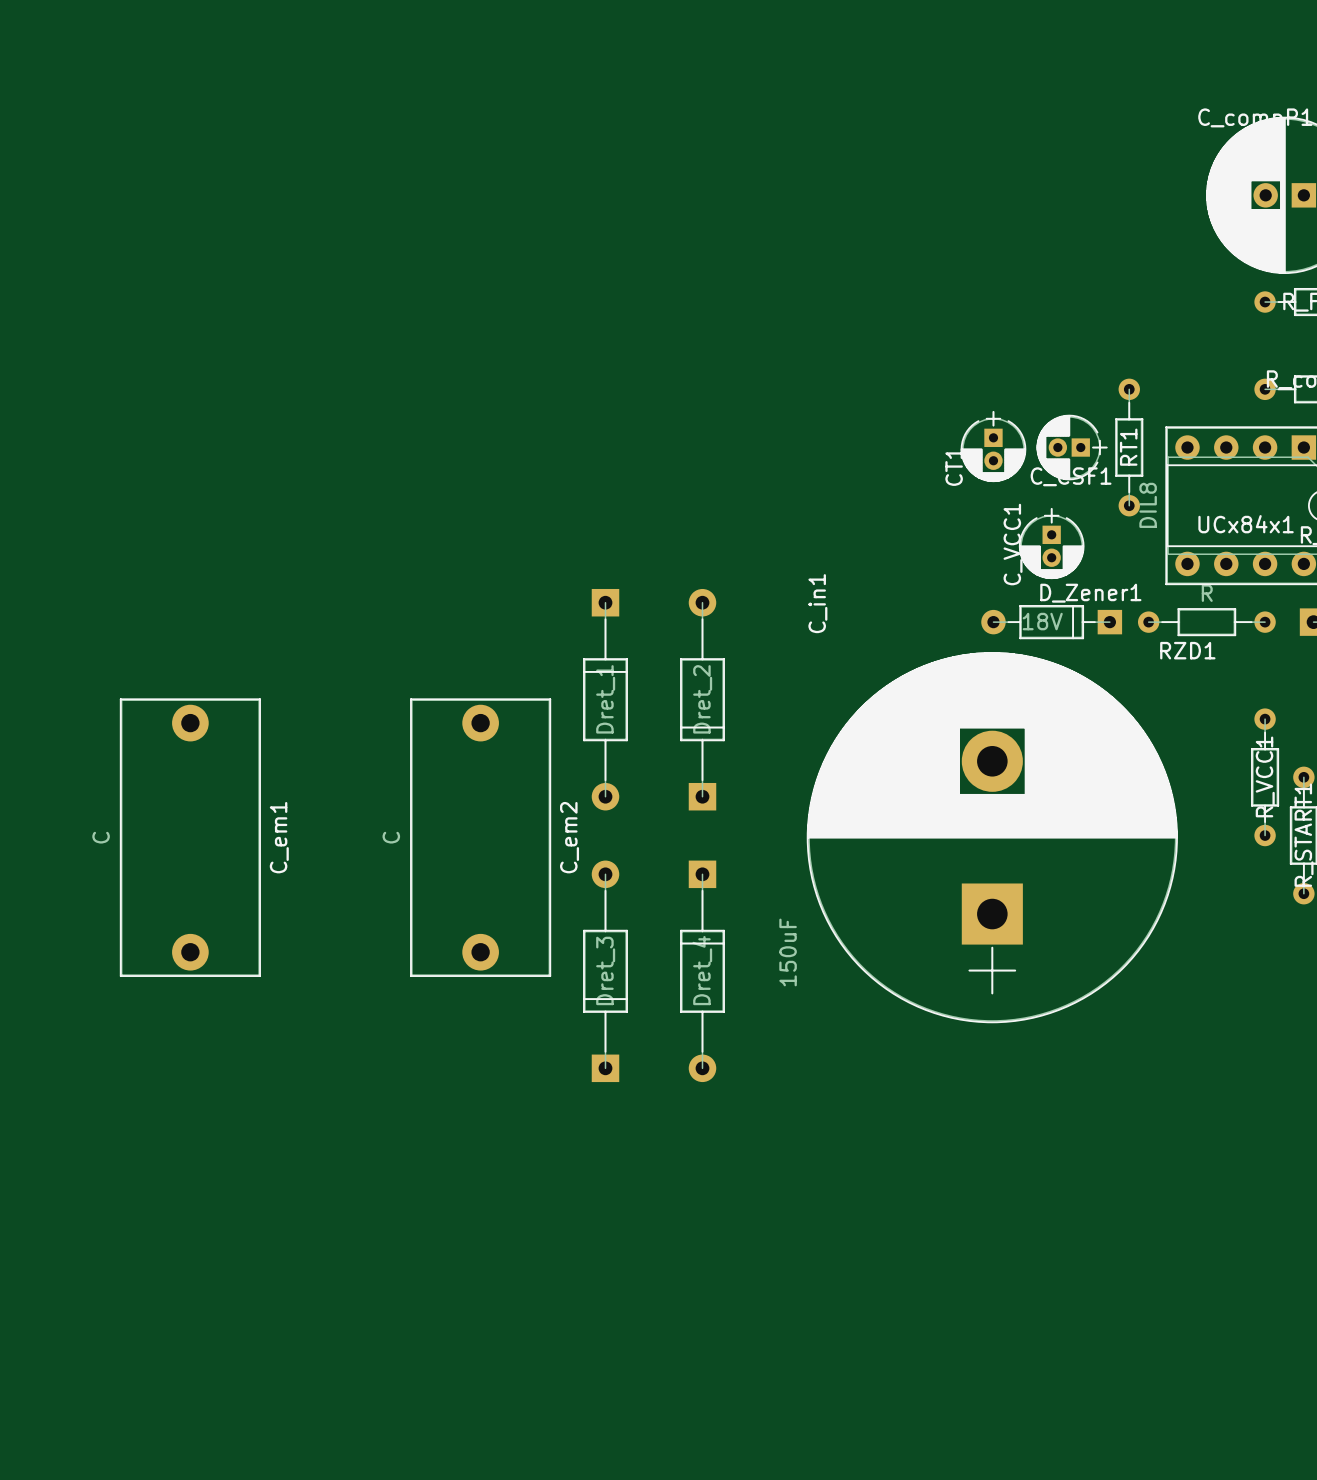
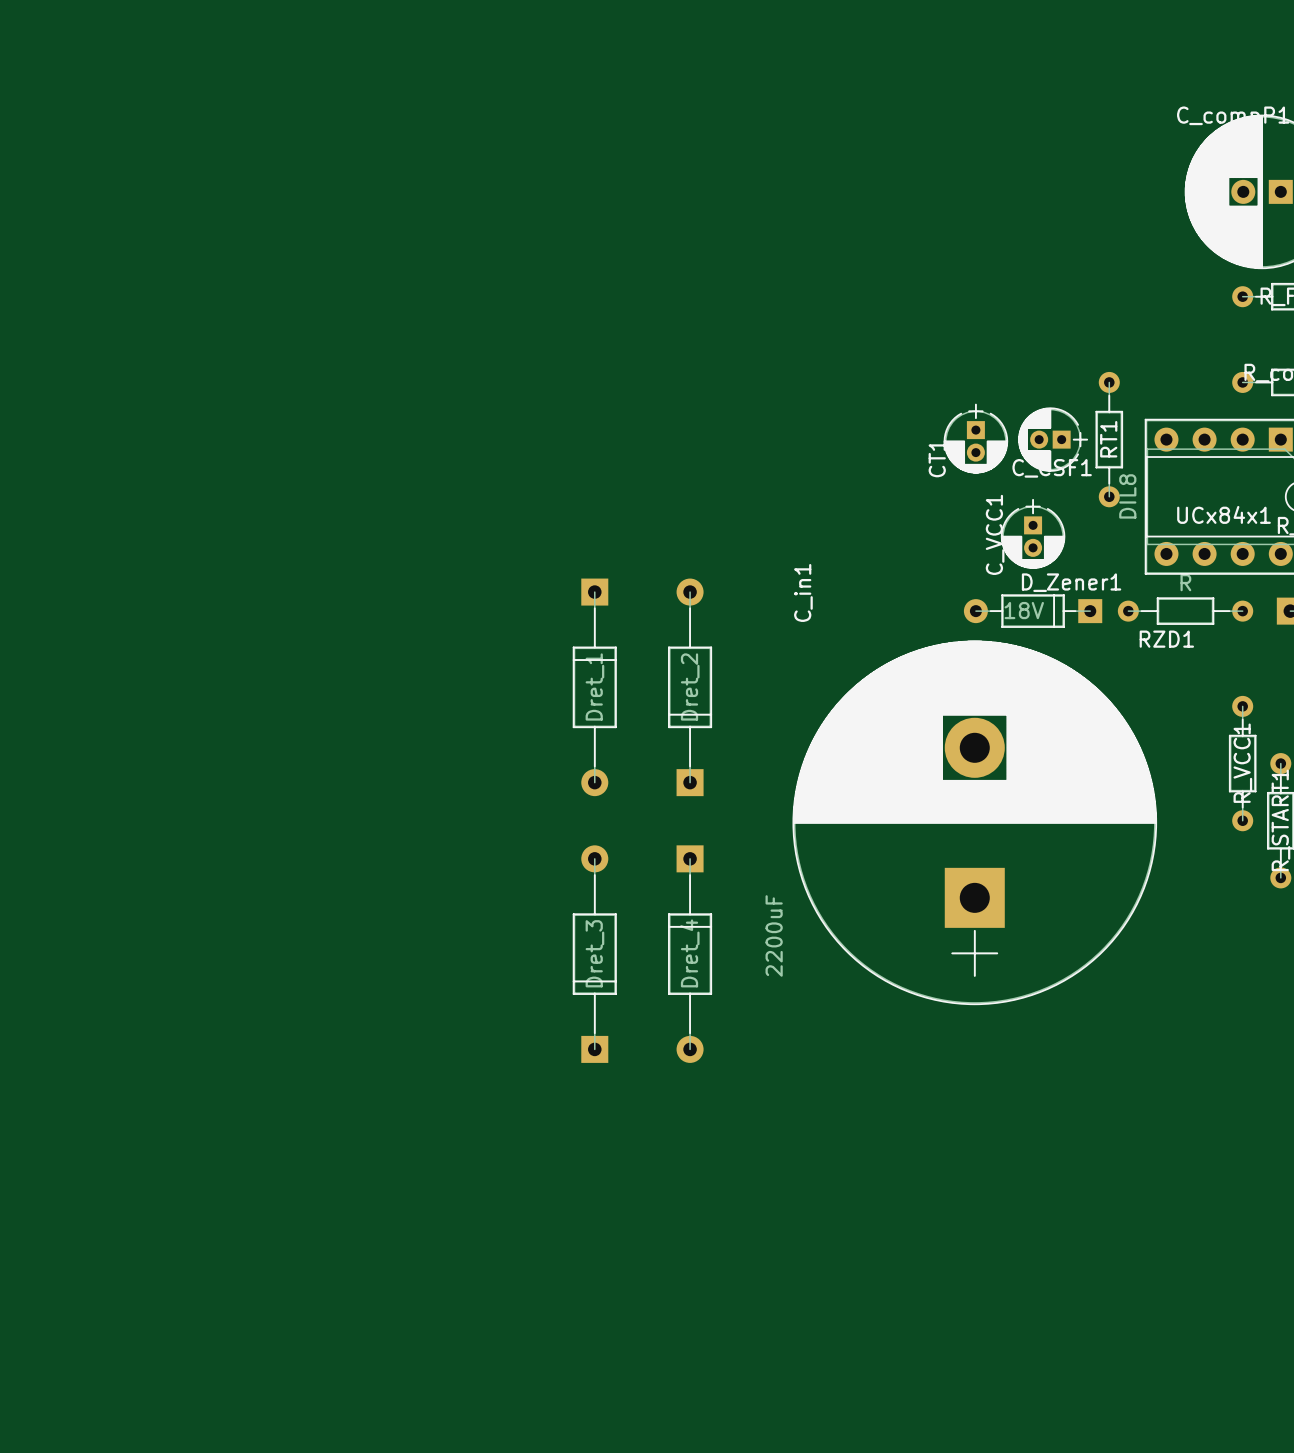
C_em1: C (190, 837) -> none
C_em2: C (480, 837) -> none
C_in1 value: 150uF (788, 952) -> 2200uF (774, 935)

